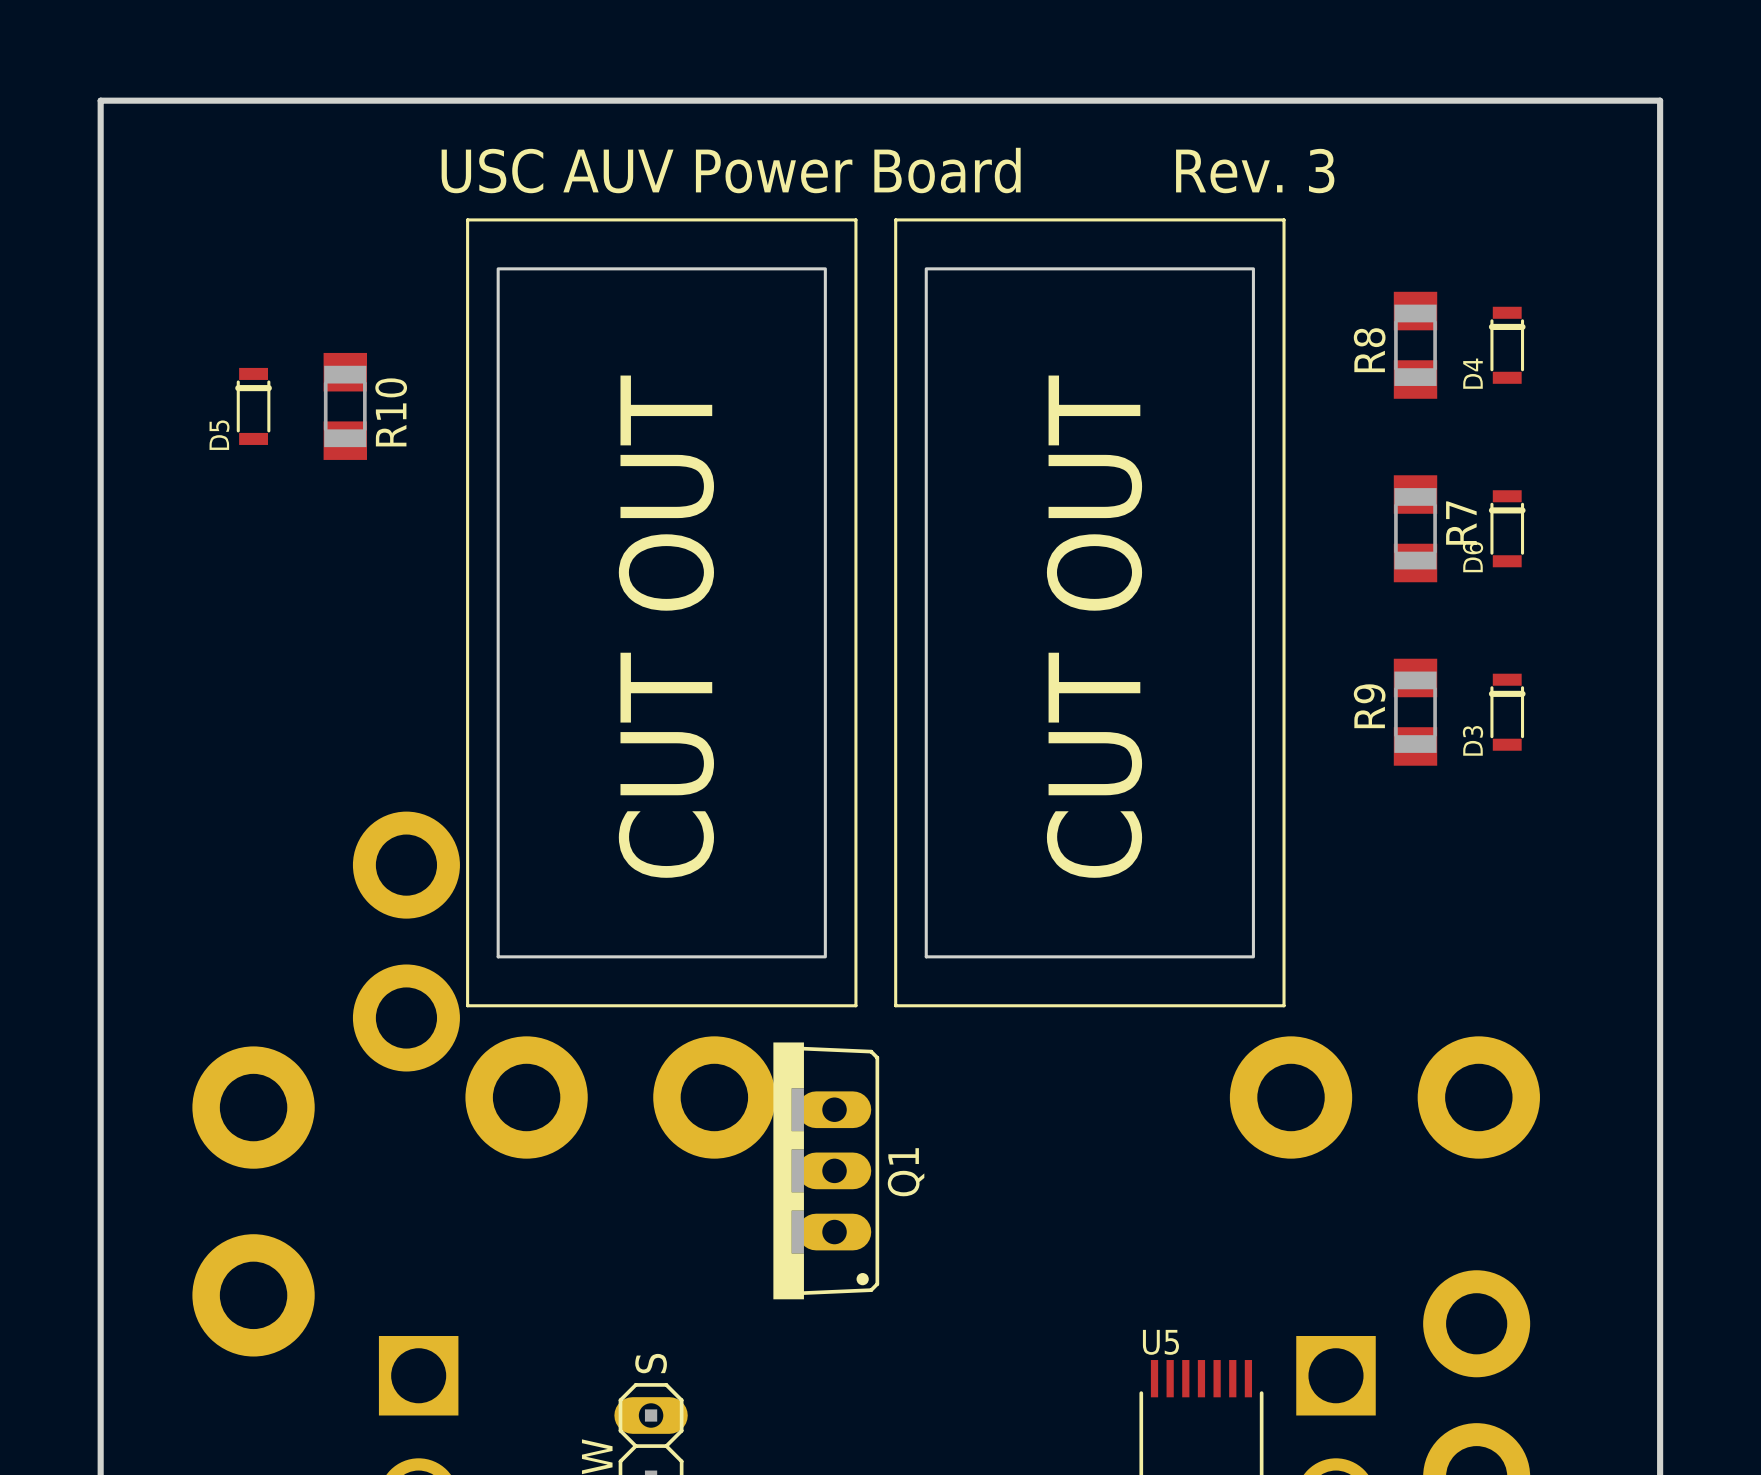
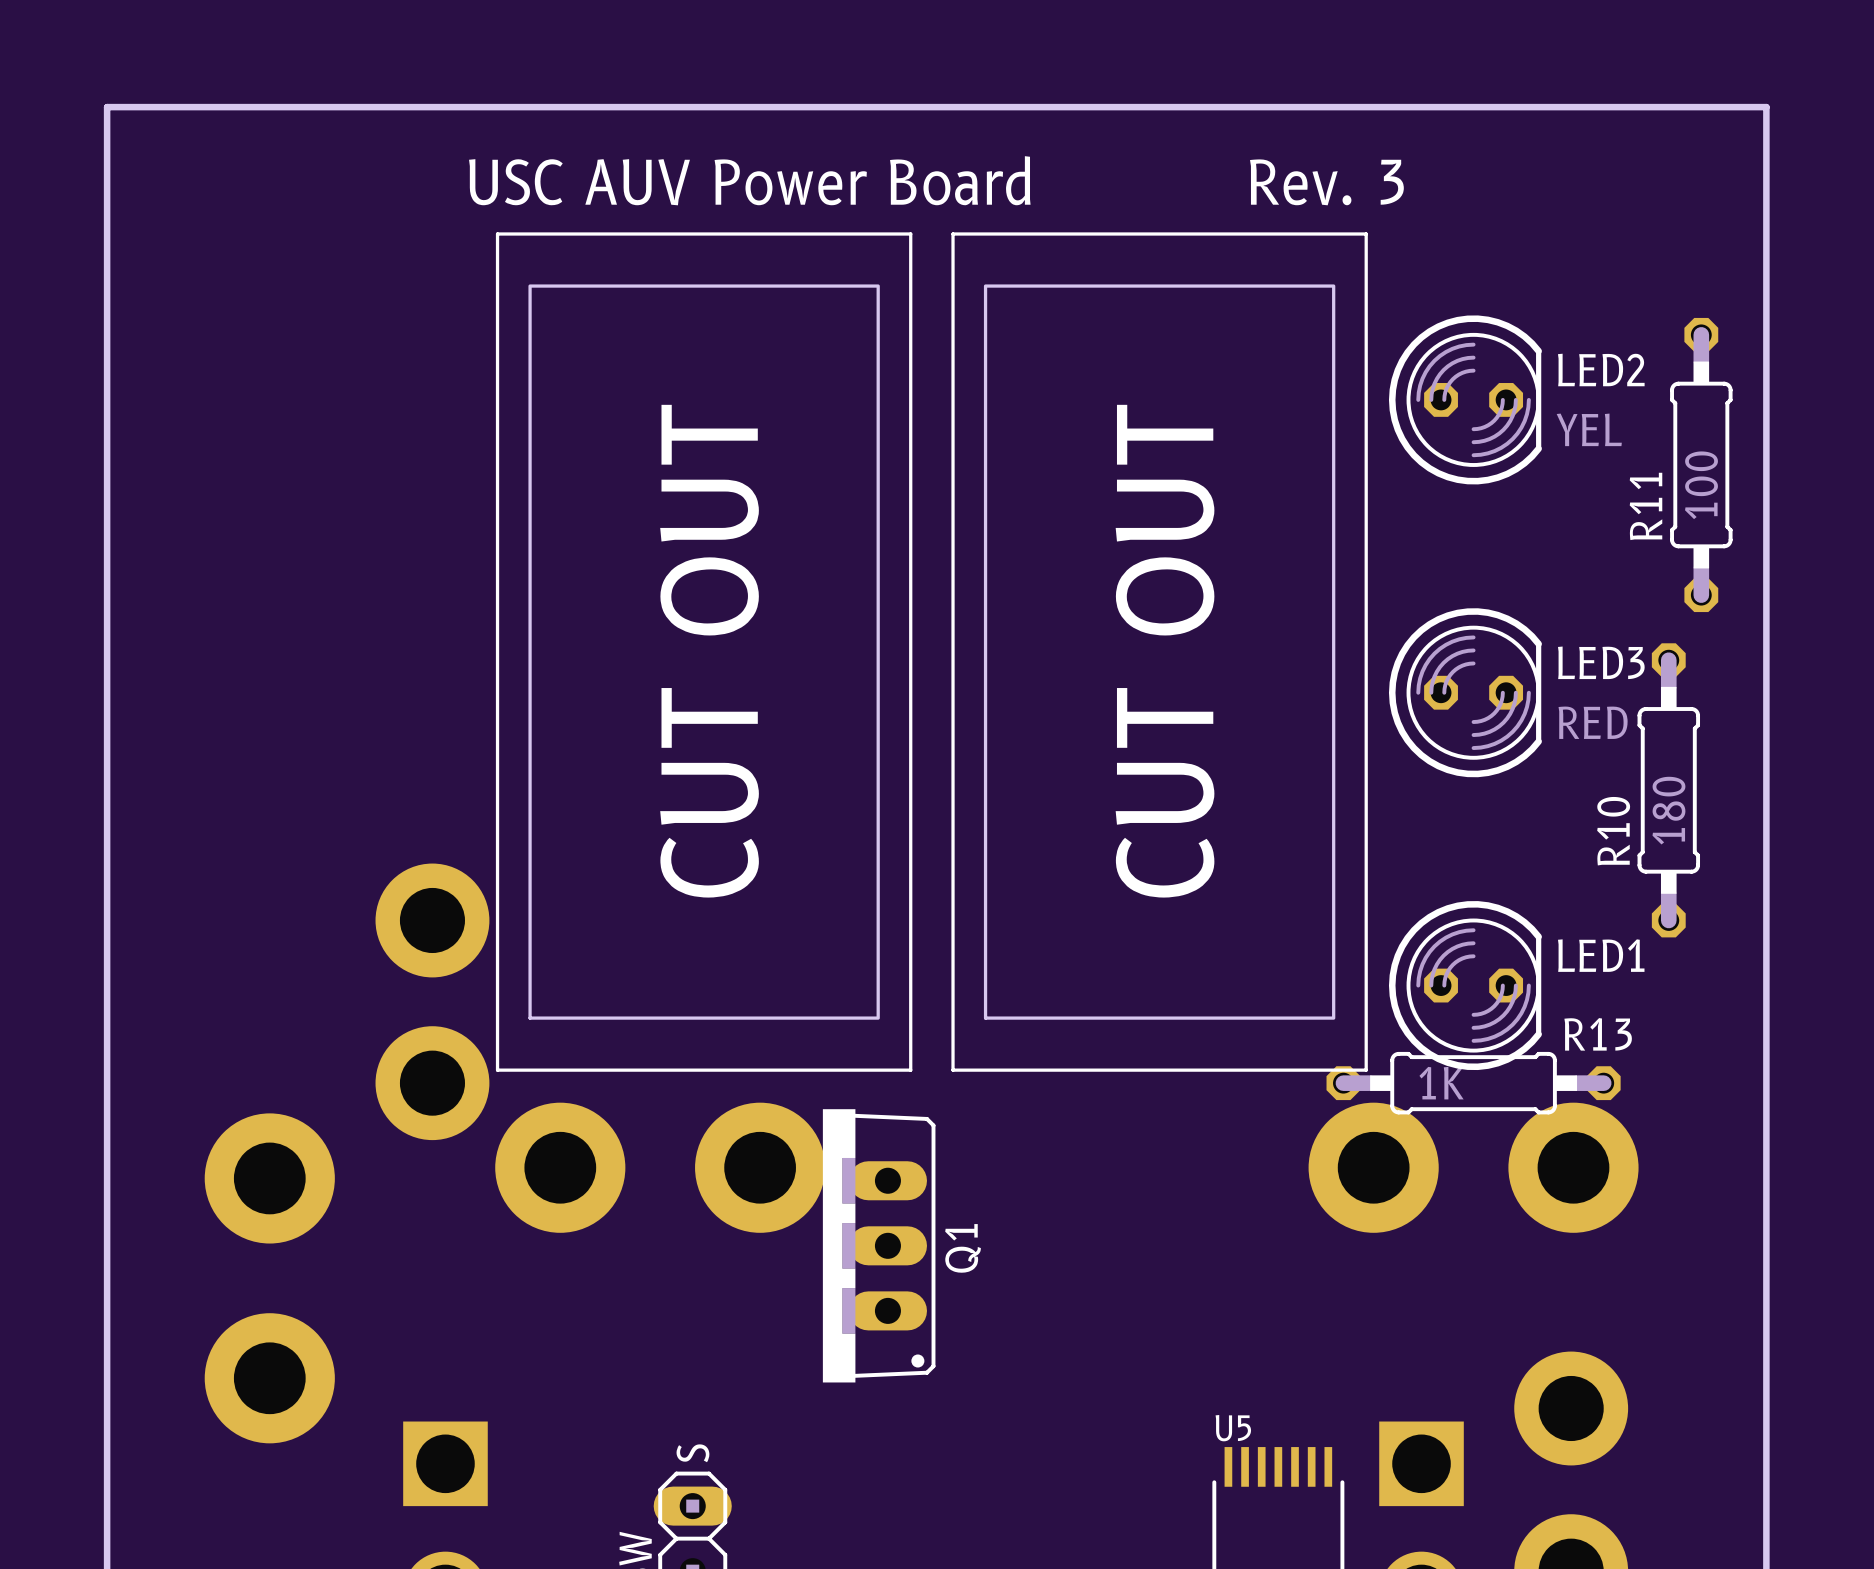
R8: (1415, 345) -> none
D4: (1507, 345) -> none
R10 footprint: [323, 352, 367, 460] -> [1637, 643, 1701, 938]
LED2: none -> YEL (1465, 399)
D5: (253, 406) -> none
R10 name position: R10 (391, 412) -> R10 (1613, 831)
R11: none -> 100 (1701, 464)
R7: (1415, 528) -> none
D6: (1507, 528) -> none
LED3: none -> RED (1465, 692)
R9: (1415, 712) -> none
D3: (1507, 712) -> none
R10 value: none -> 180 (1668, 810)
LED1: none -> (1465, 985)
R13: none -> 1K (1473, 1083)

